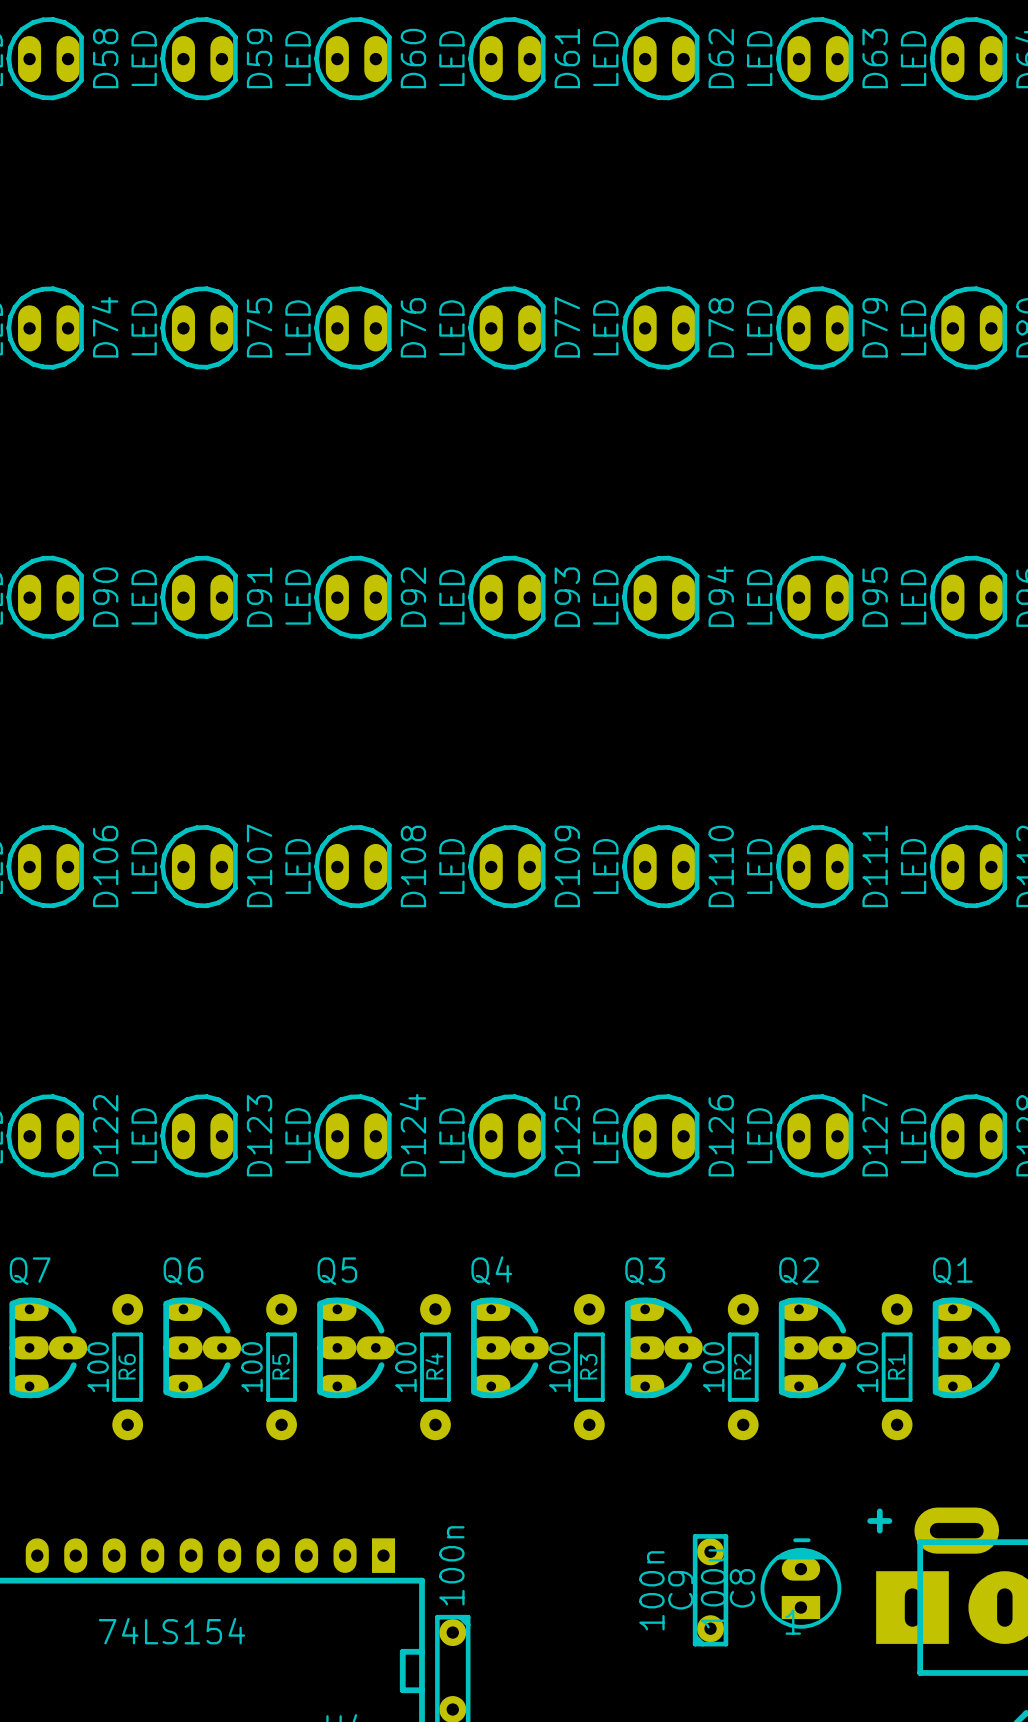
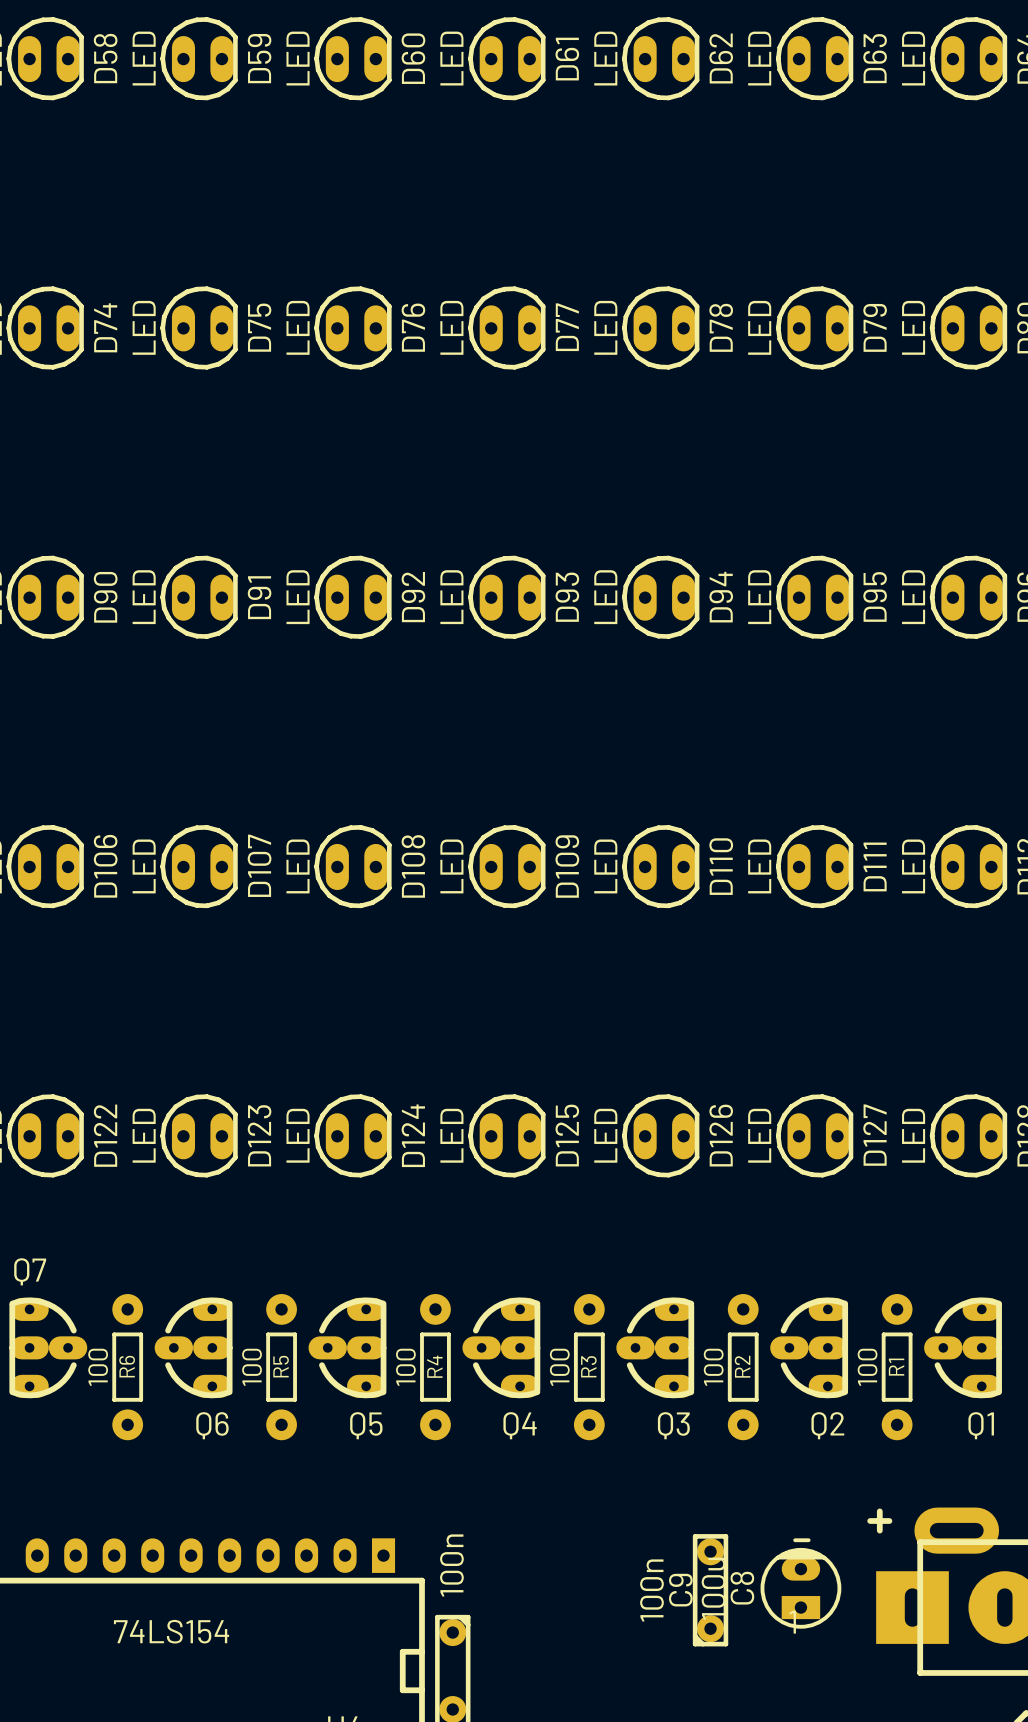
Q6 rotation: 0° (202, 1347) -> 180° (193, 1347)
Q5 rotation: 0° (356, 1347) -> 180° (347, 1347)
Q4 rotation: 0° (509, 1347) -> 180° (501, 1347)
Q3 rotation: 0° (663, 1347) -> 180° (655, 1347)
Q2 rotation: 0° (817, 1347) -> 180° (809, 1347)
Q1 rotation: 0° (971, 1347) -> 180° (963, 1347)

